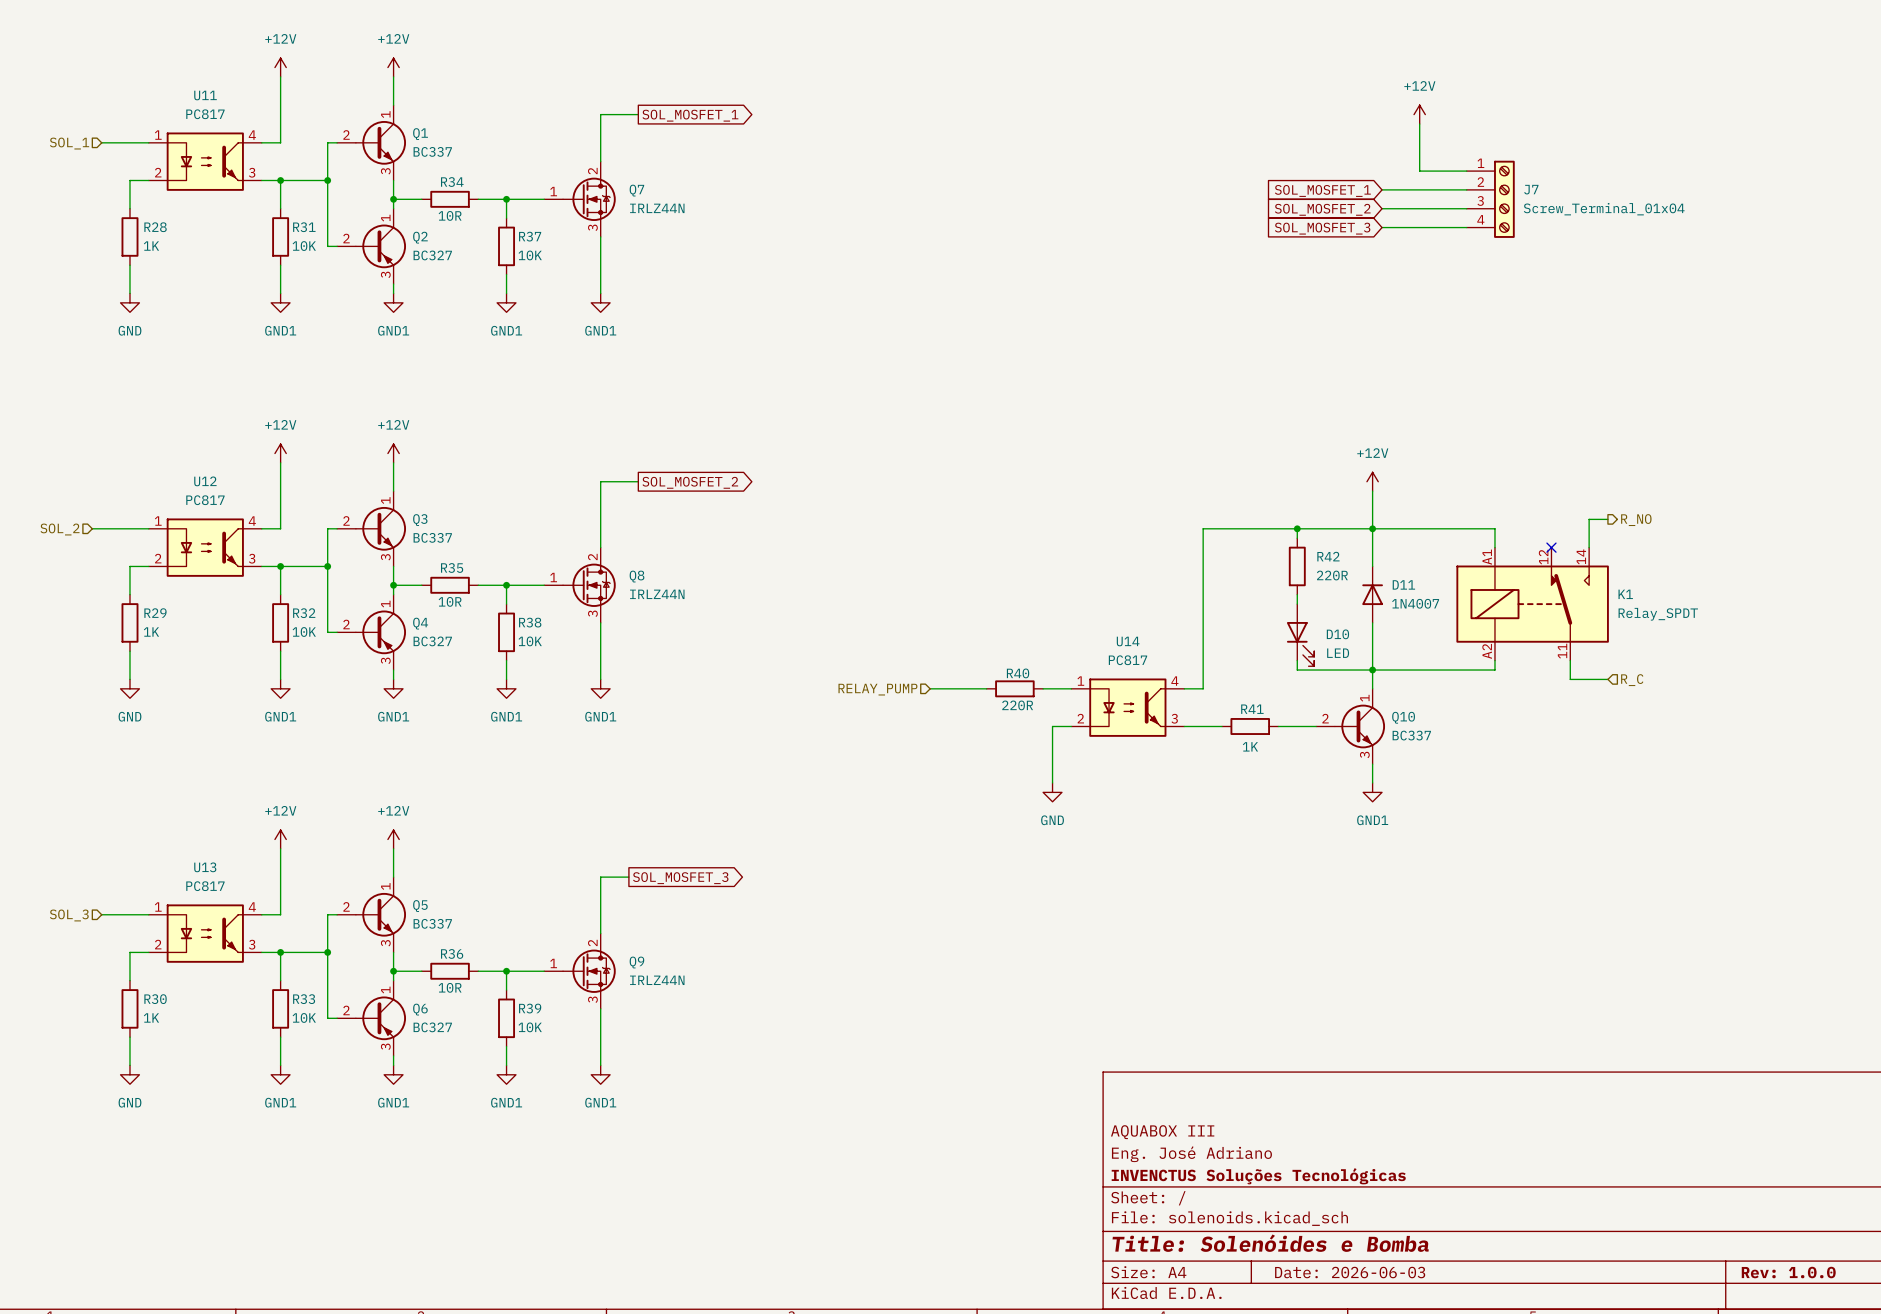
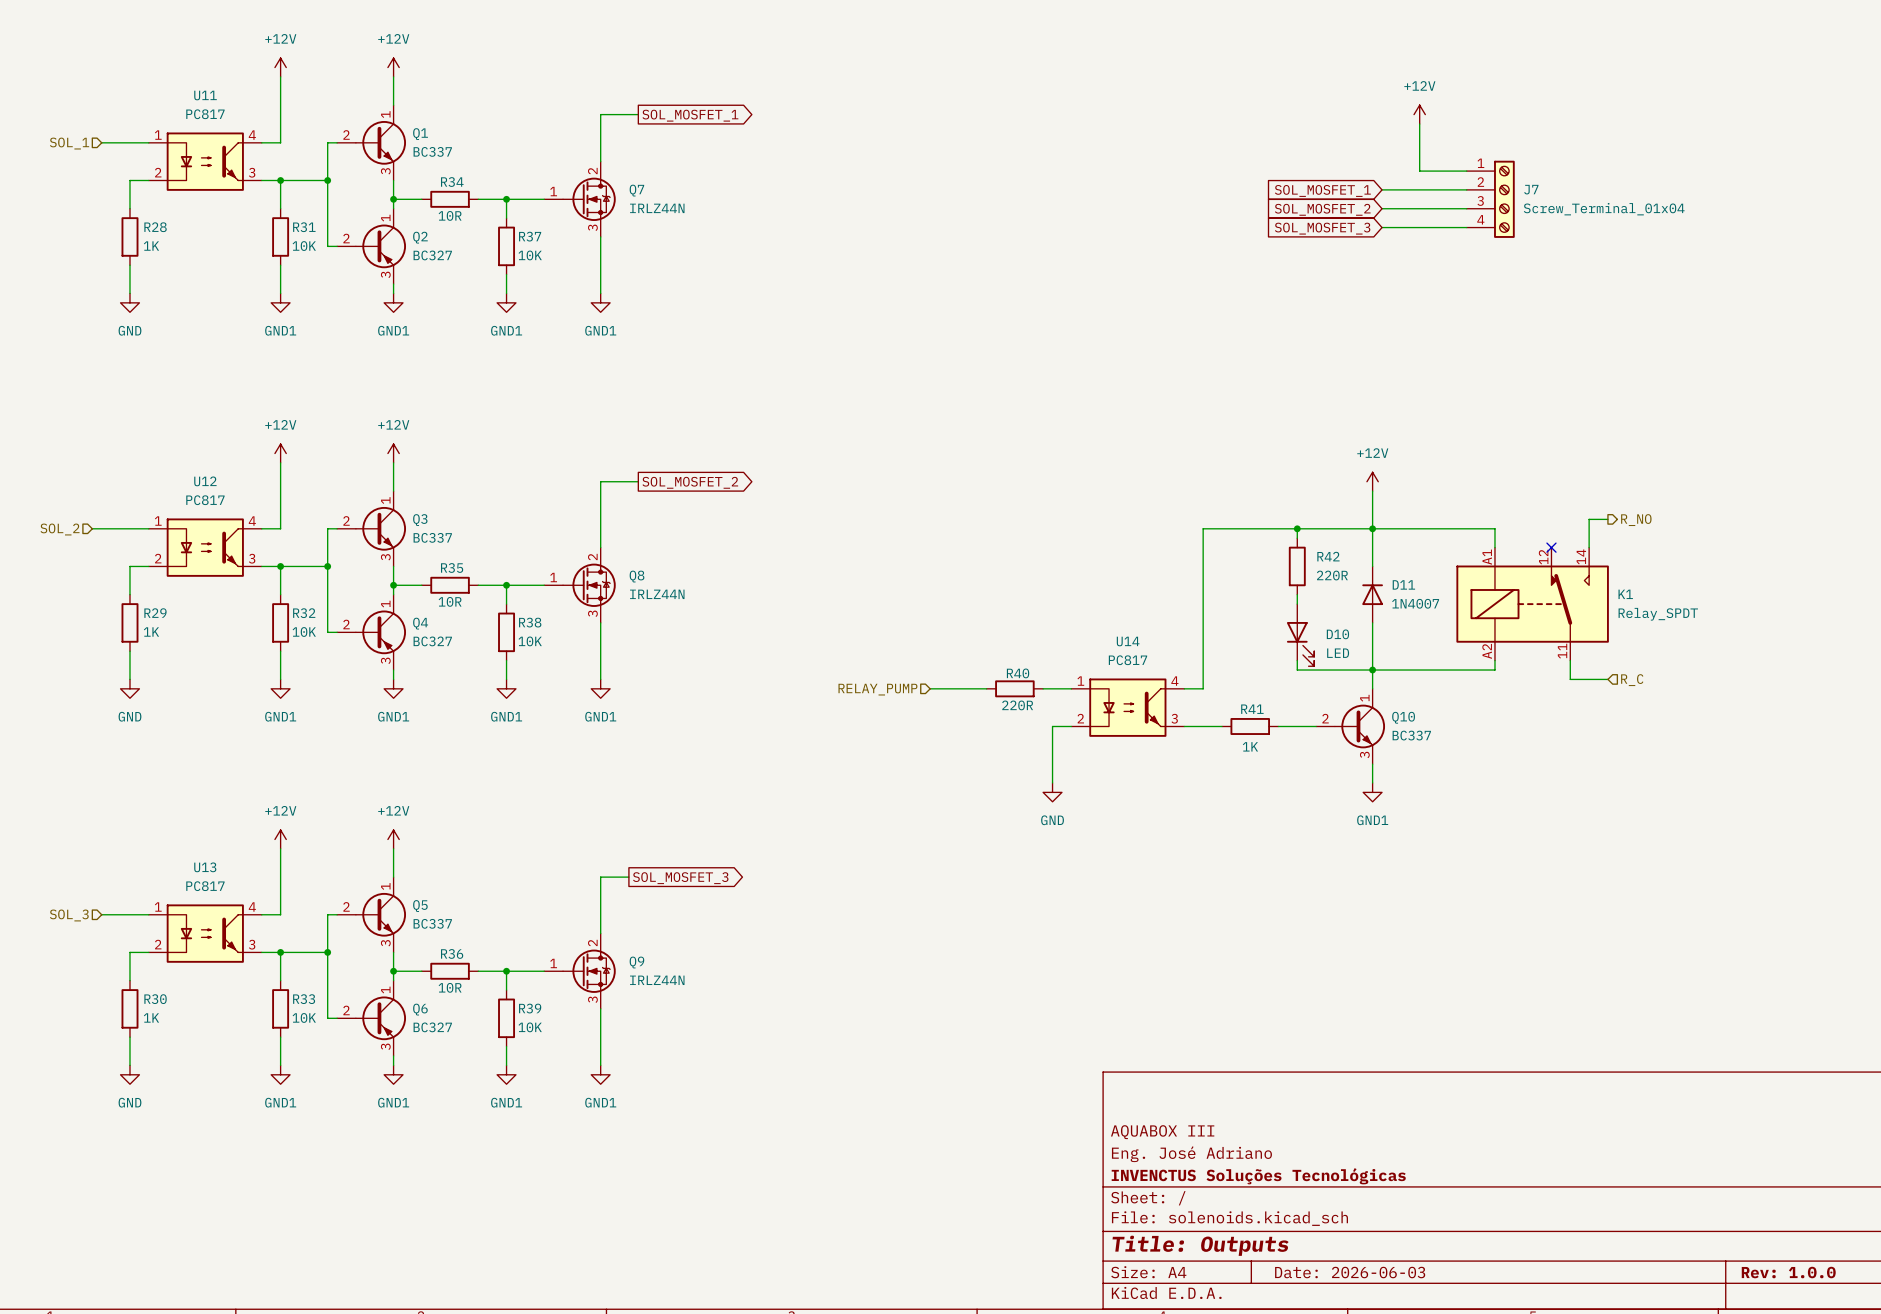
title block: Title: Solenóides e Bomba (1270, 1243) -> Title: Outputs (1200, 1245)

